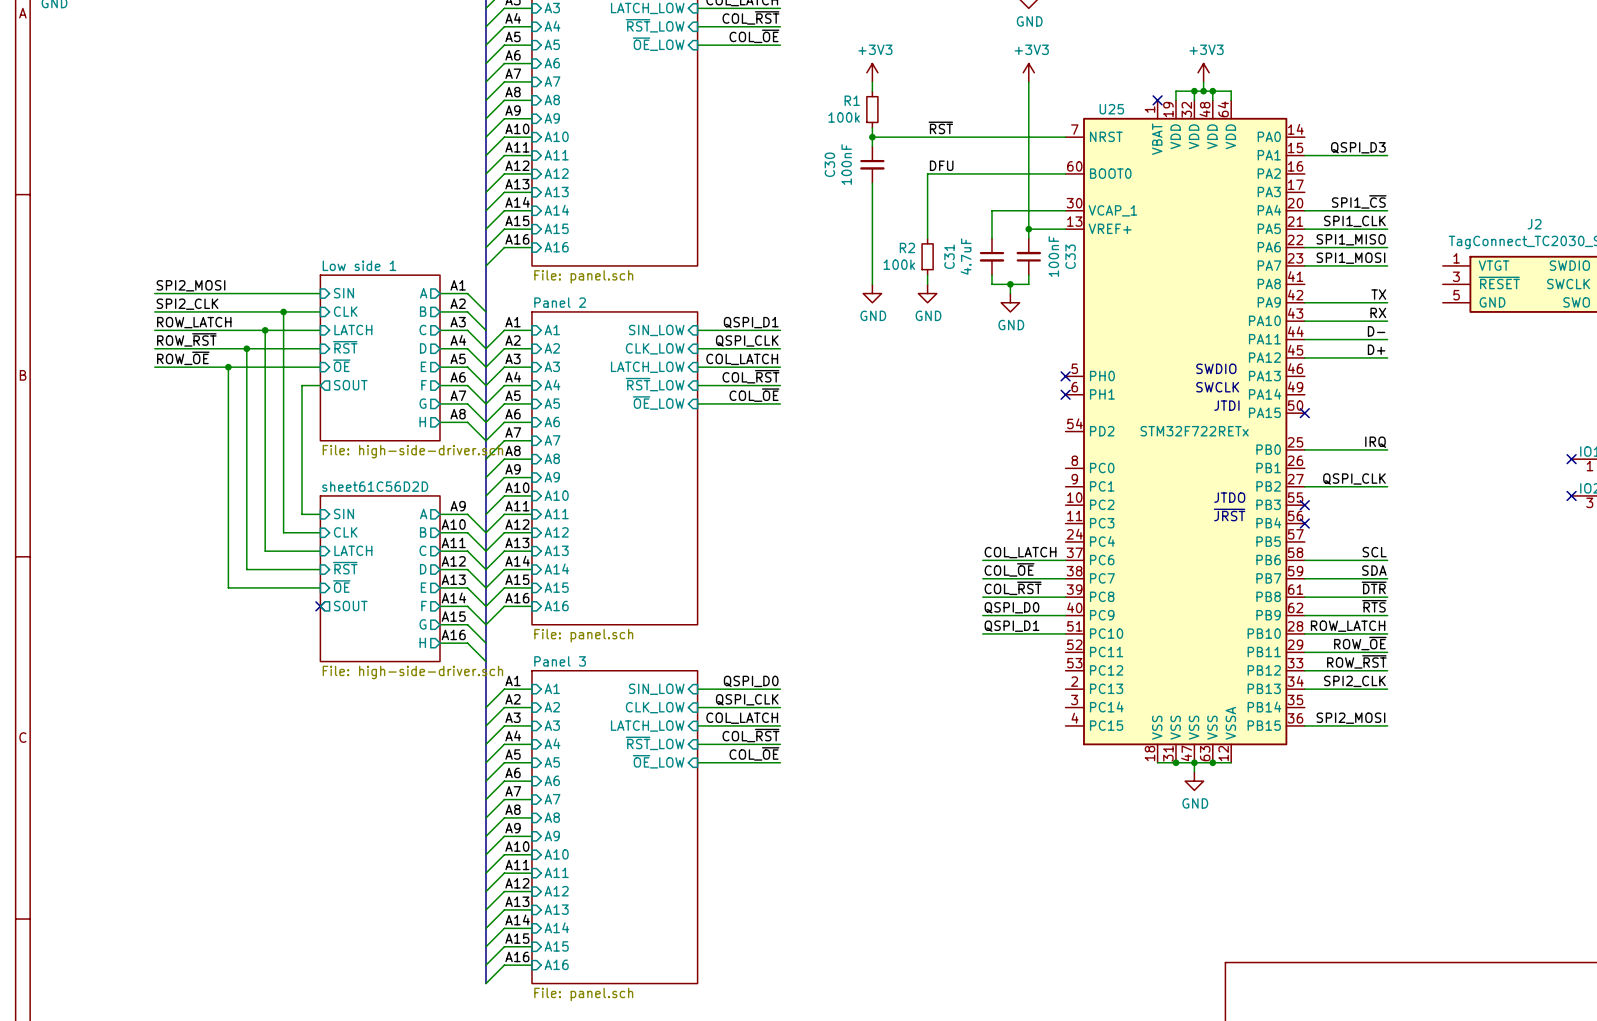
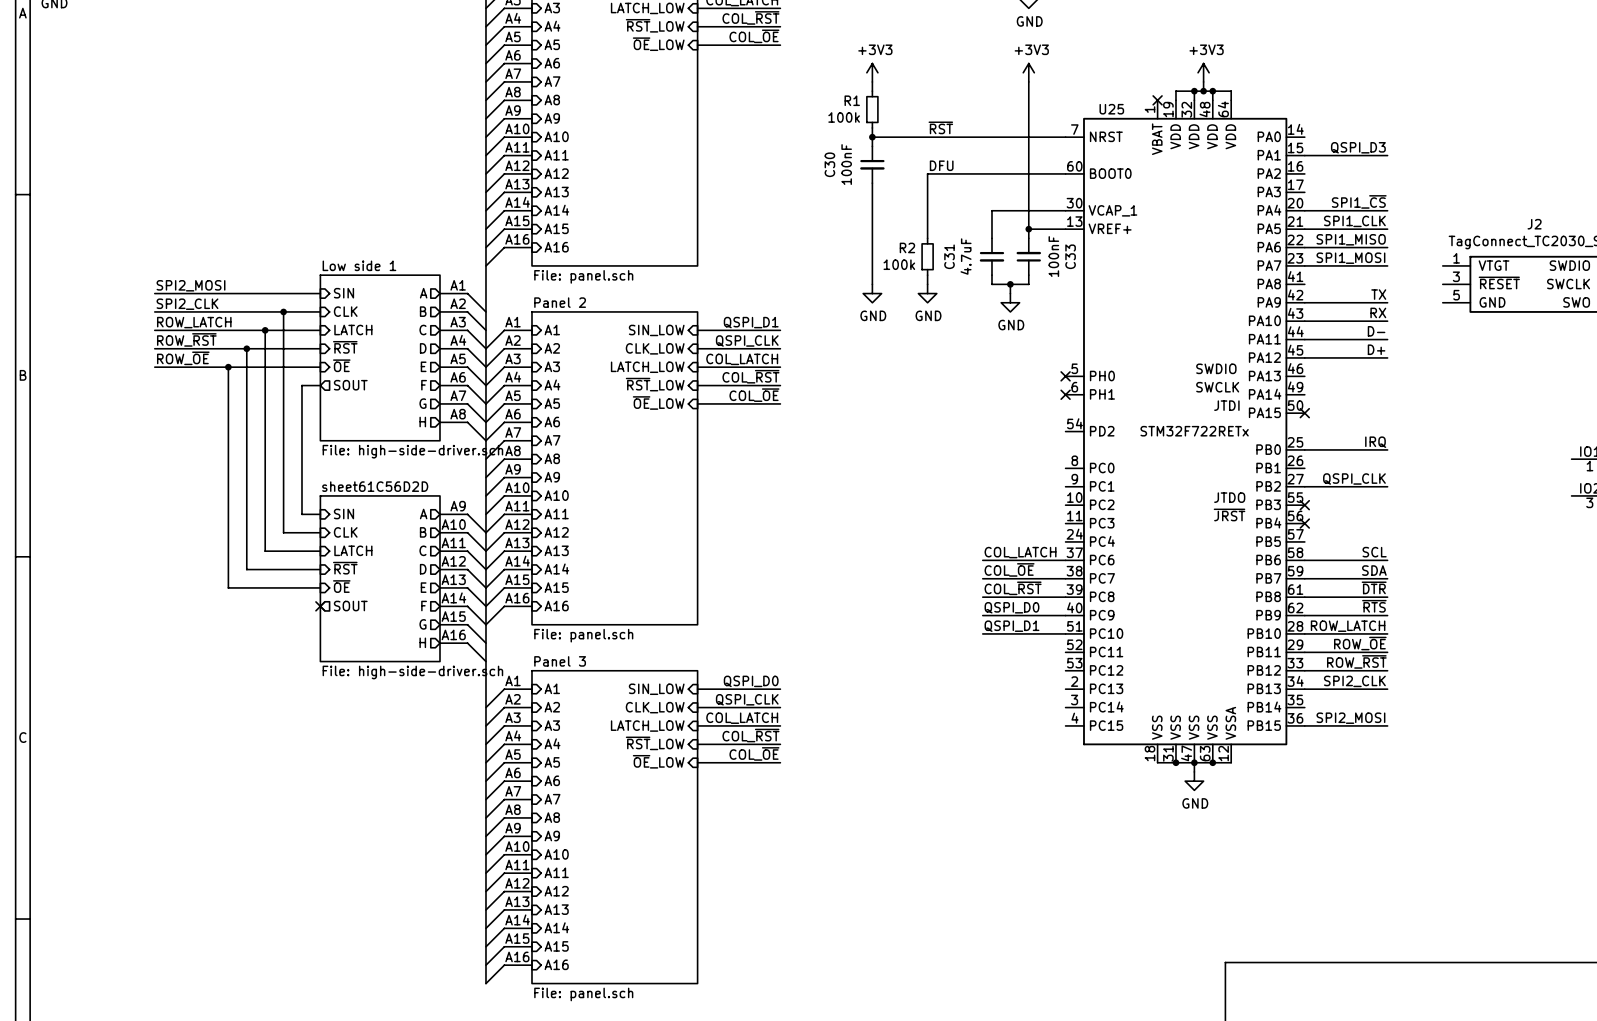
no-connect mark: (1571, 459) -> none
no-connect mark: (1571, 495) -> none

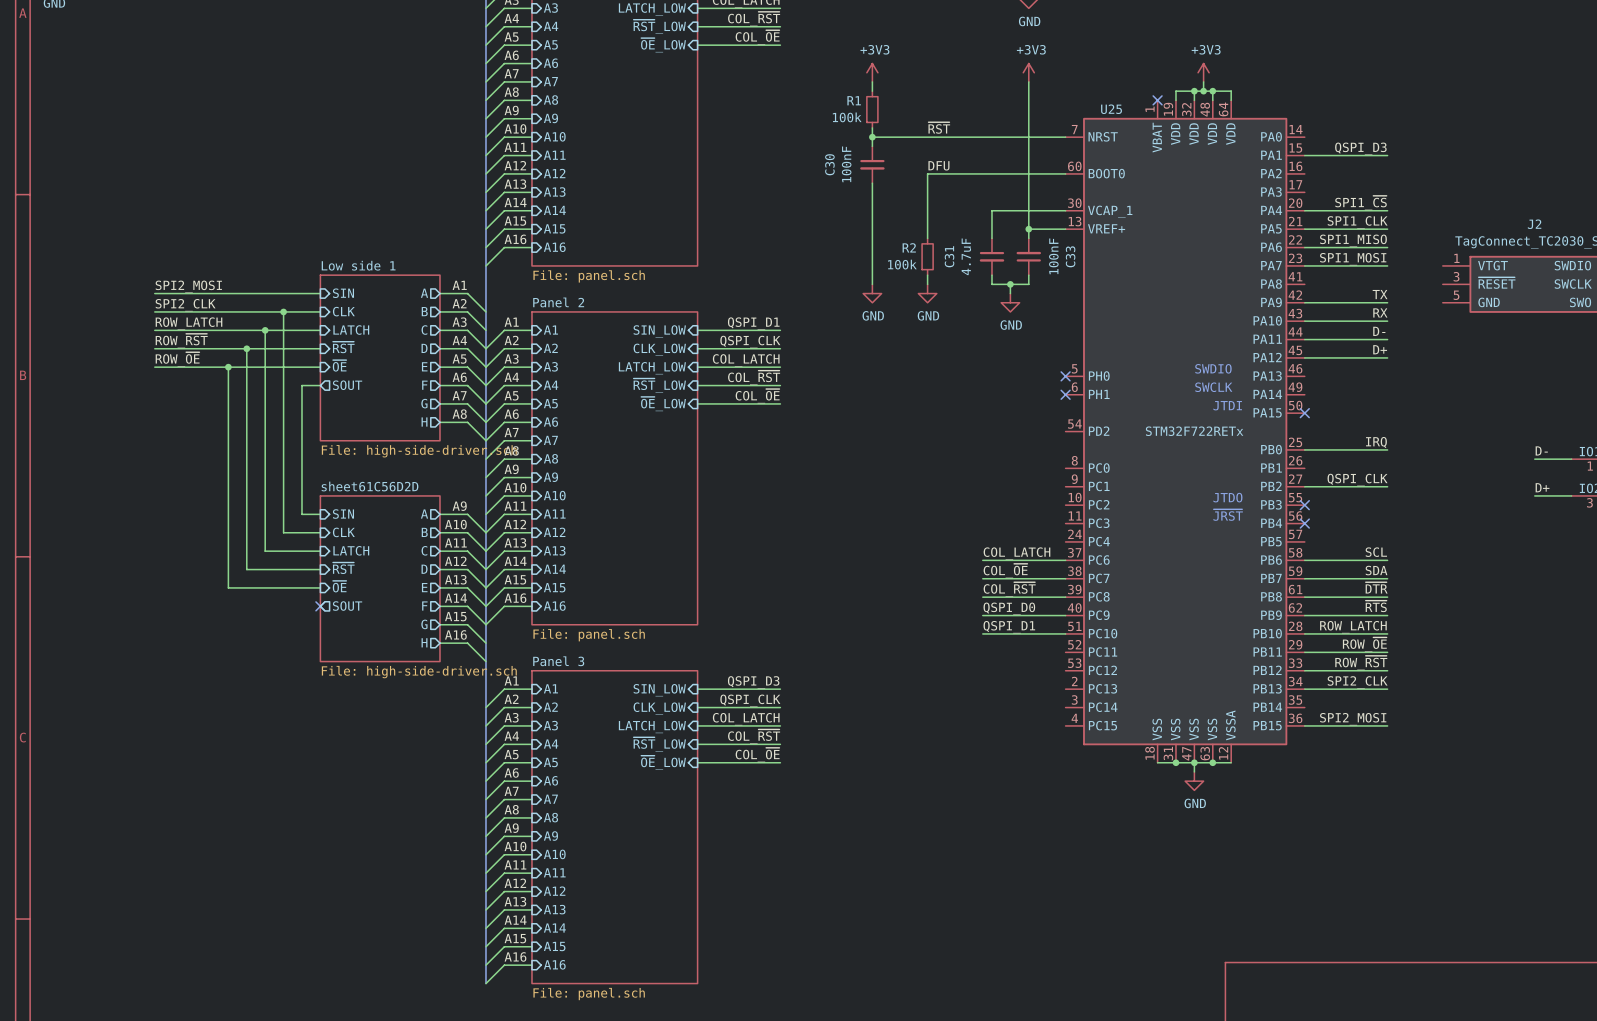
label: none -> D- (1541, 450)
wire: none -> (1534, 459) (1571, 459)
label: none -> D+ (1542, 487)
wire: none -> (1534, 495) (1571, 495)
label: QSPI_D0 (751, 681) -> QSPI_D3 (753, 682)

